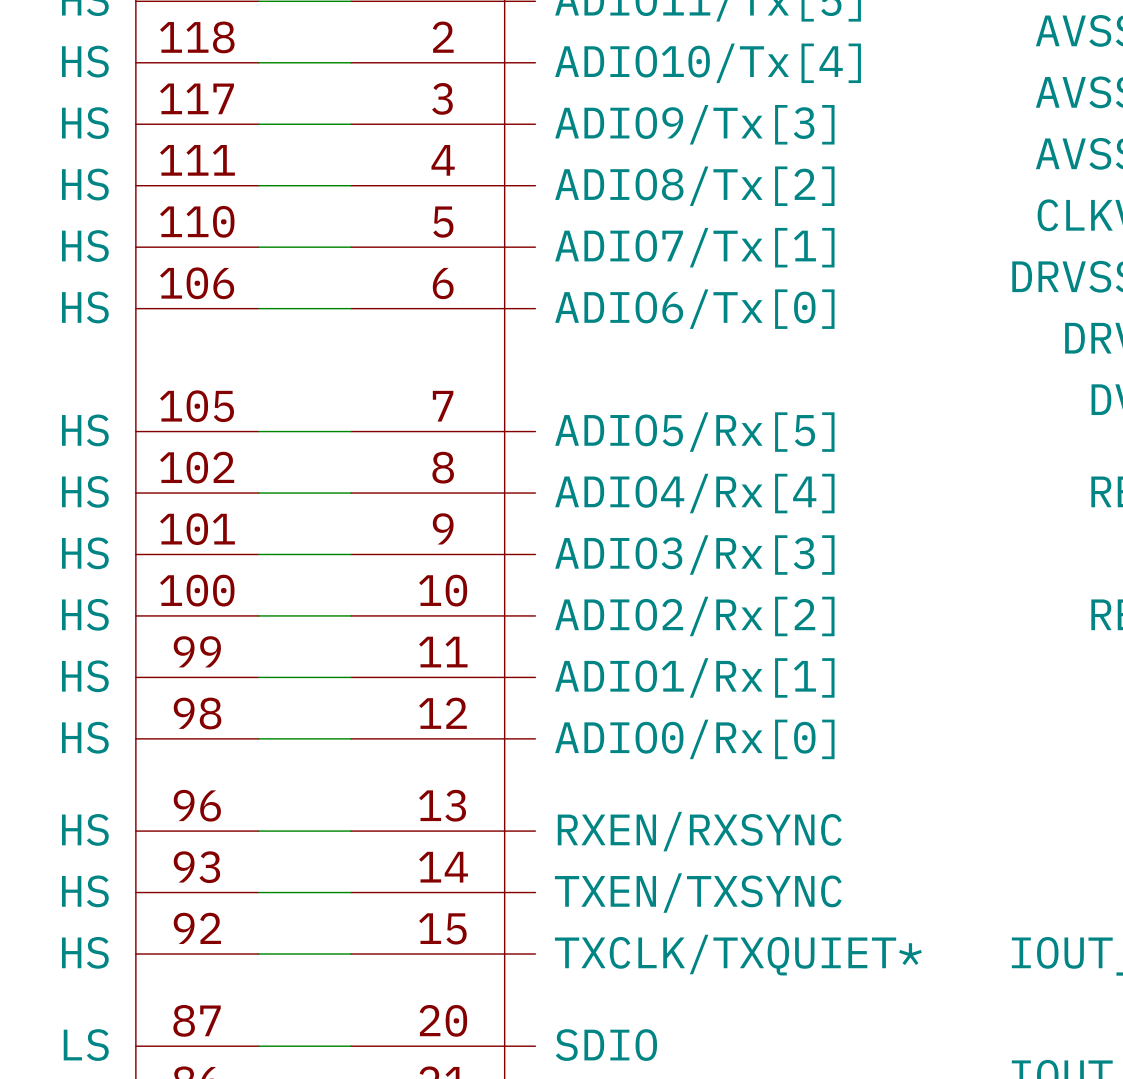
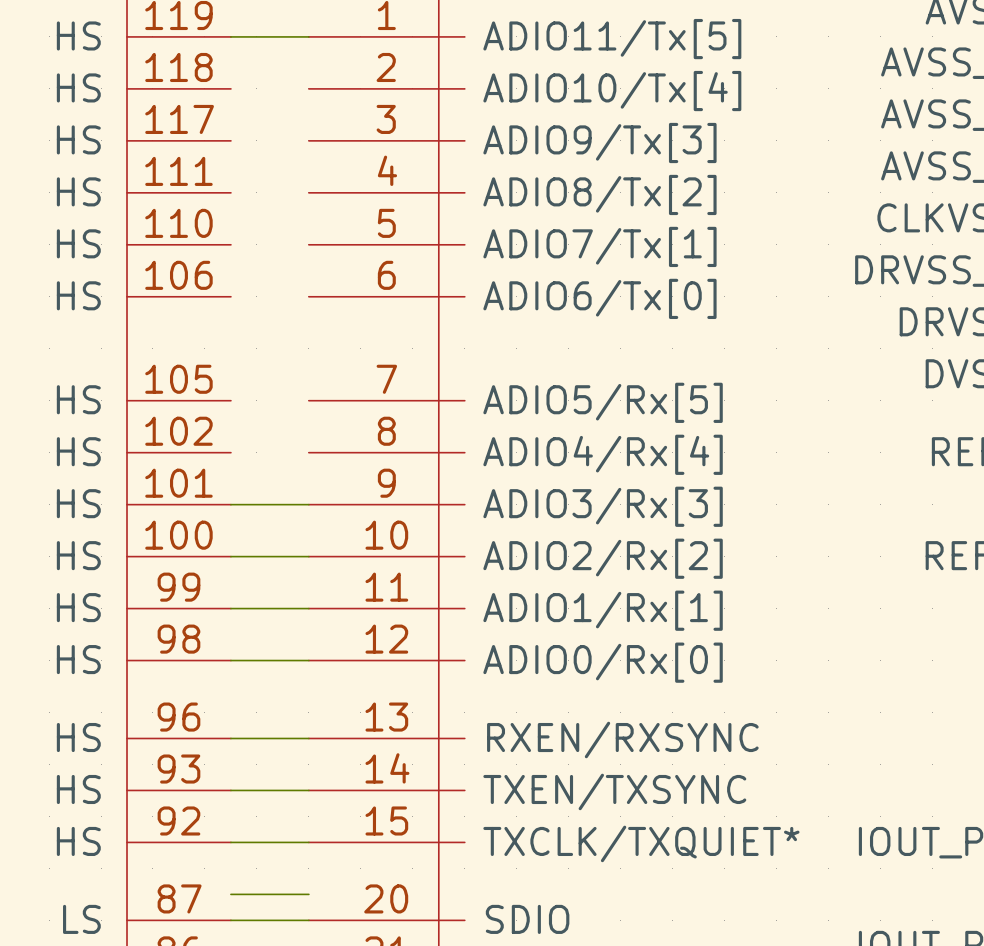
wire: (258, 62) (350, 62) -> none
wire: (258, 124) (350, 124) -> none
wire: (258, 185) (350, 185) -> none
wire: (258, 247) (350, 247) -> none
wire: (258, 308) (350, 308) -> none
wire: (258, 431) (350, 431) -> none
wire: (258, 493) (350, 493) -> (230, 894) (308, 894)

